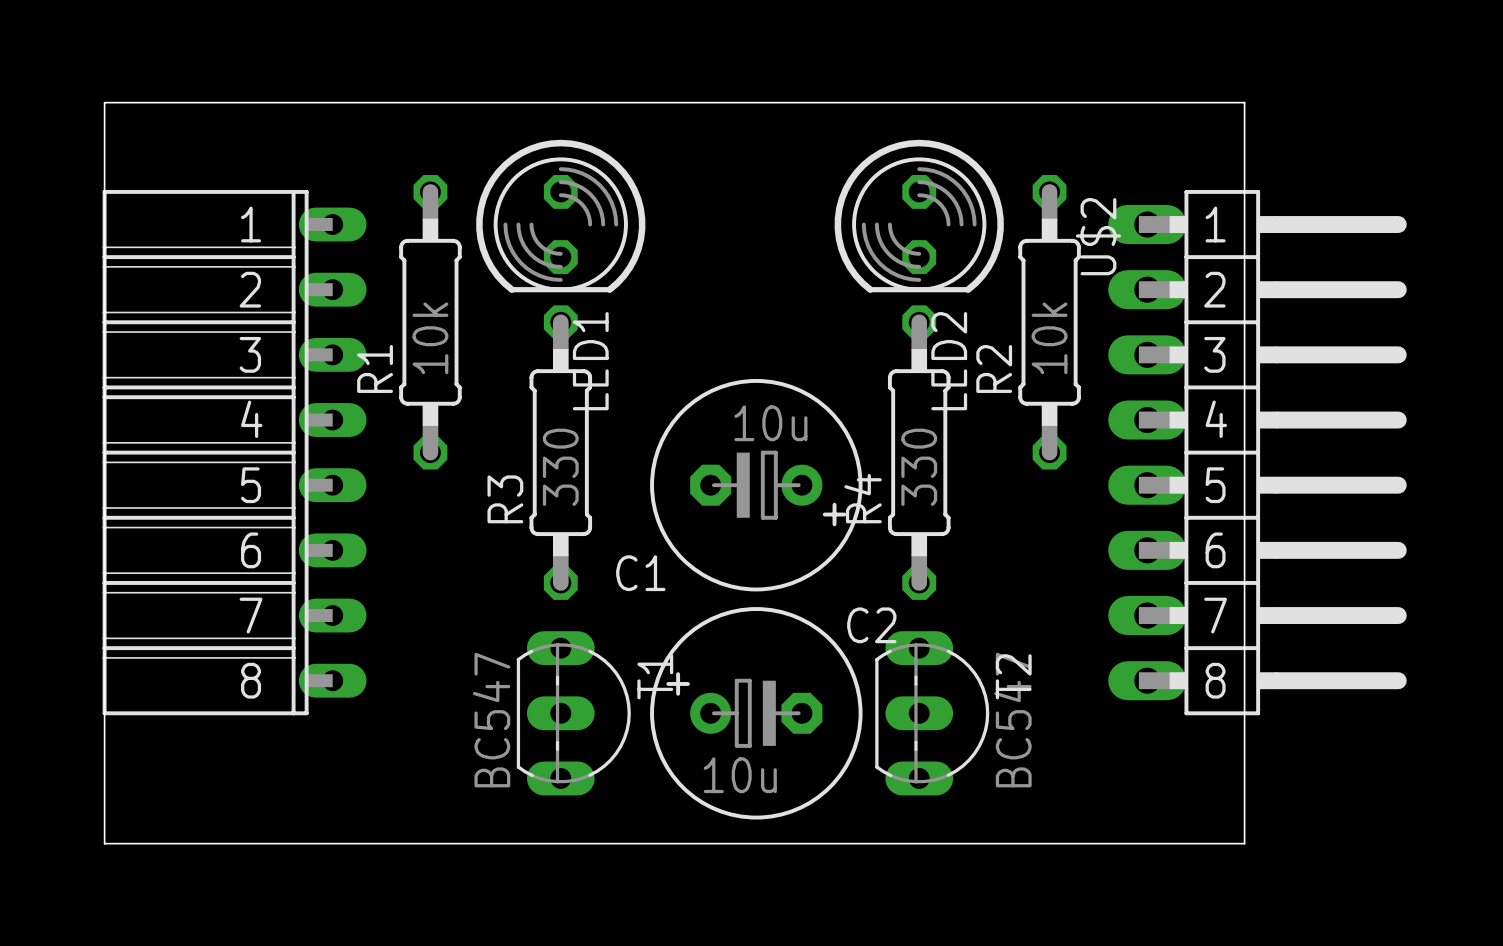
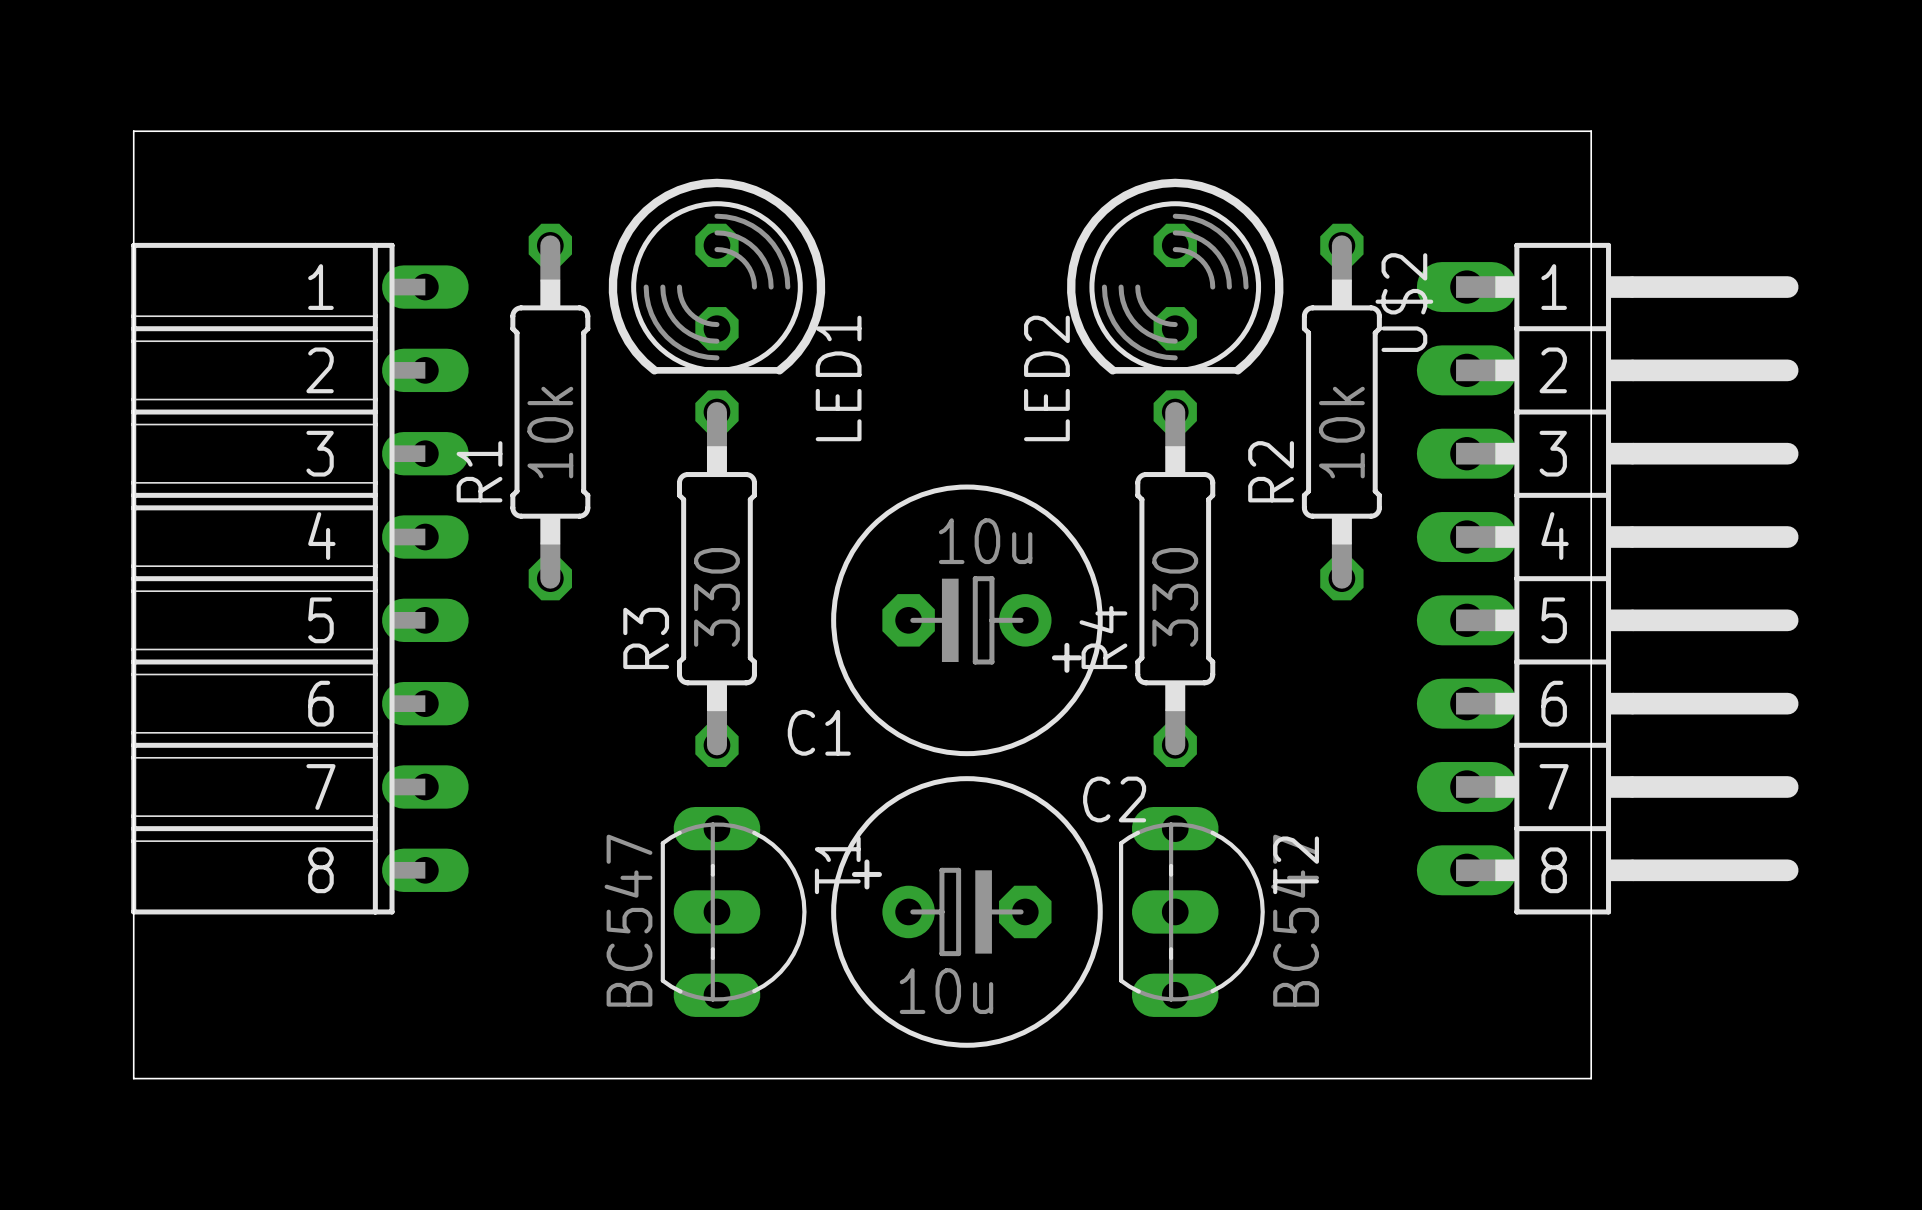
LED1 name position: LED1 (590, 361) -> LED1 (838, 378)
LED2 name position: LED2 (949, 361) -> LED2 (1046, 378)

